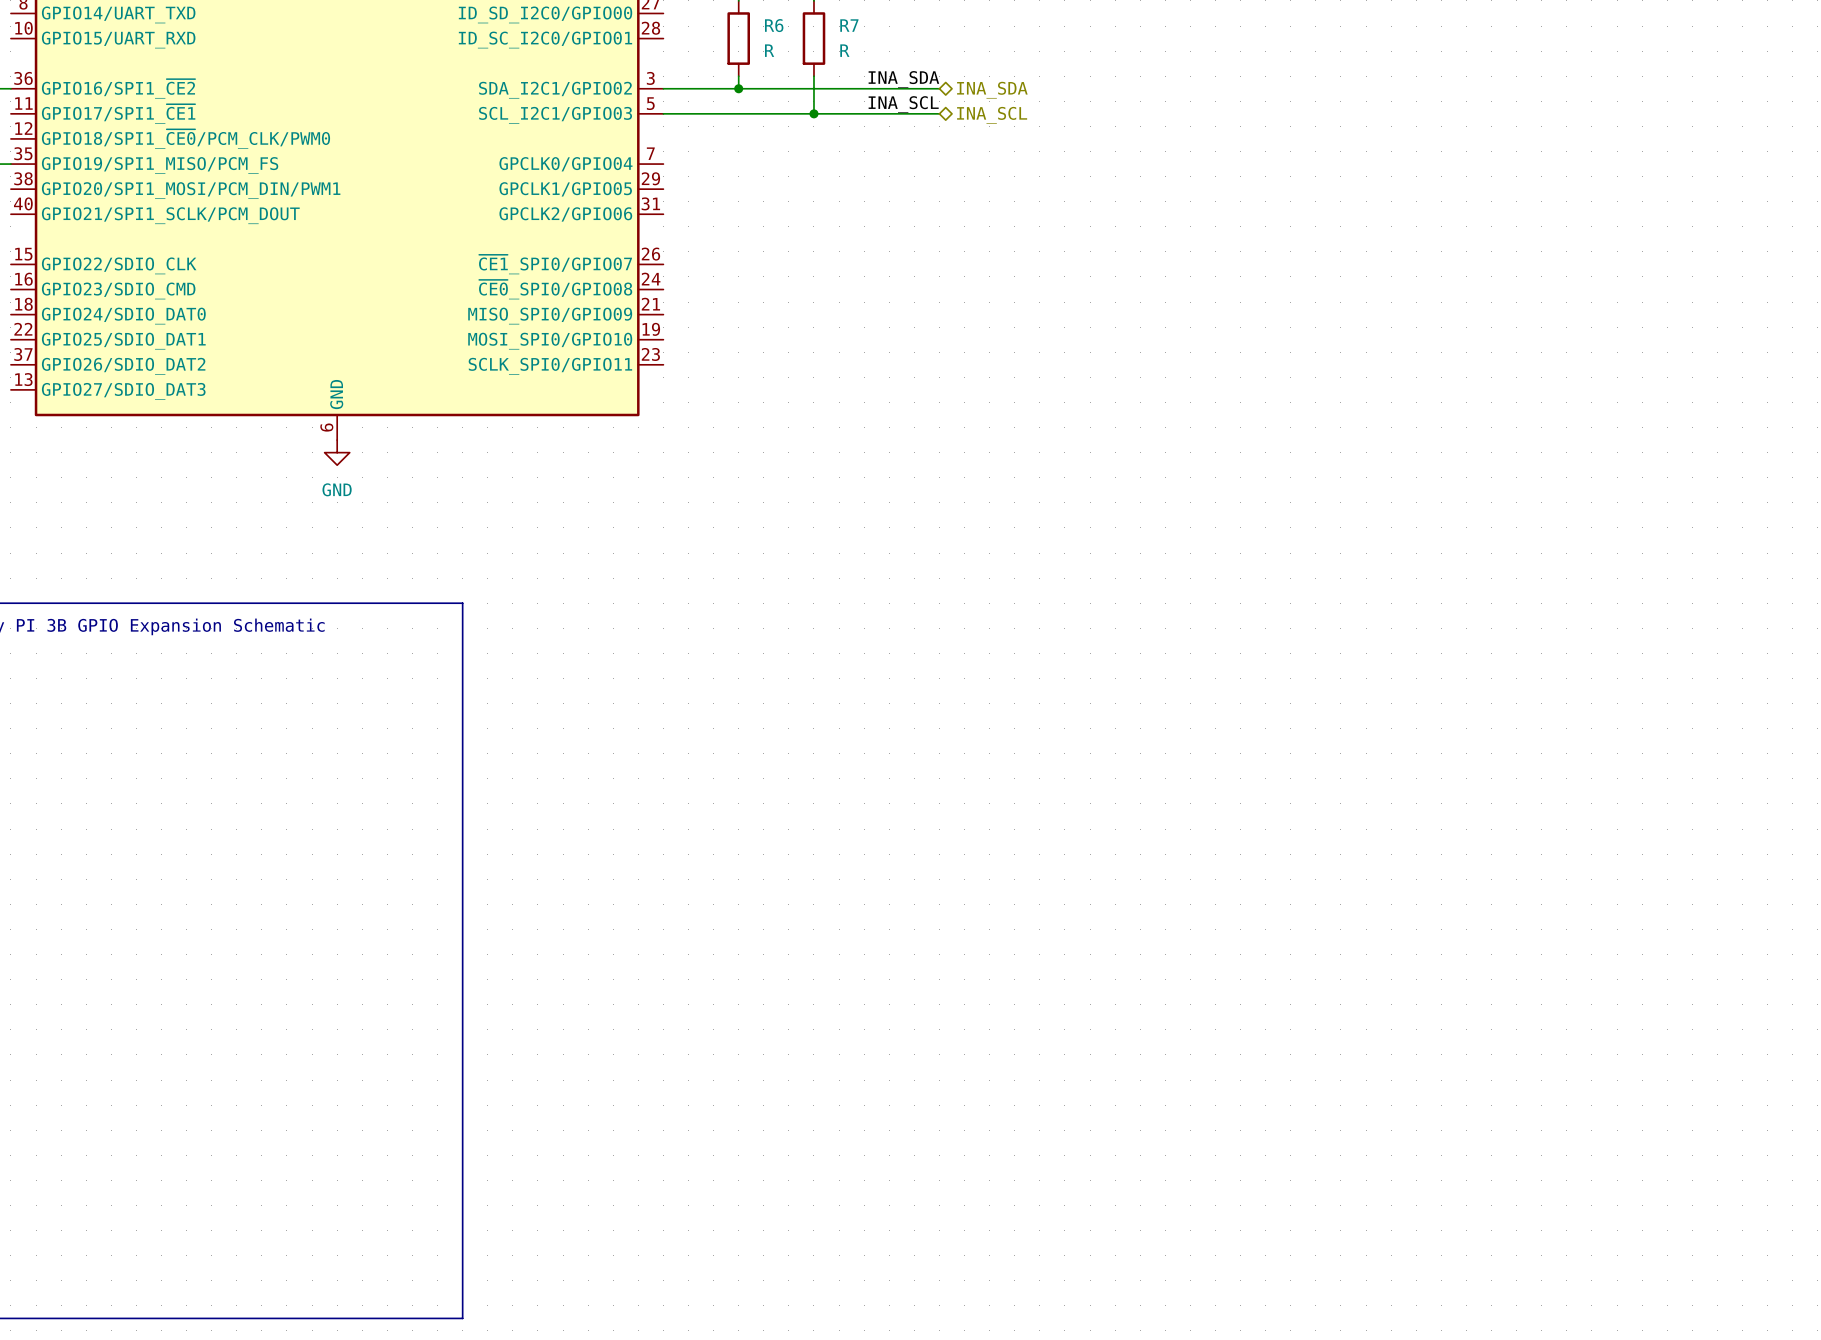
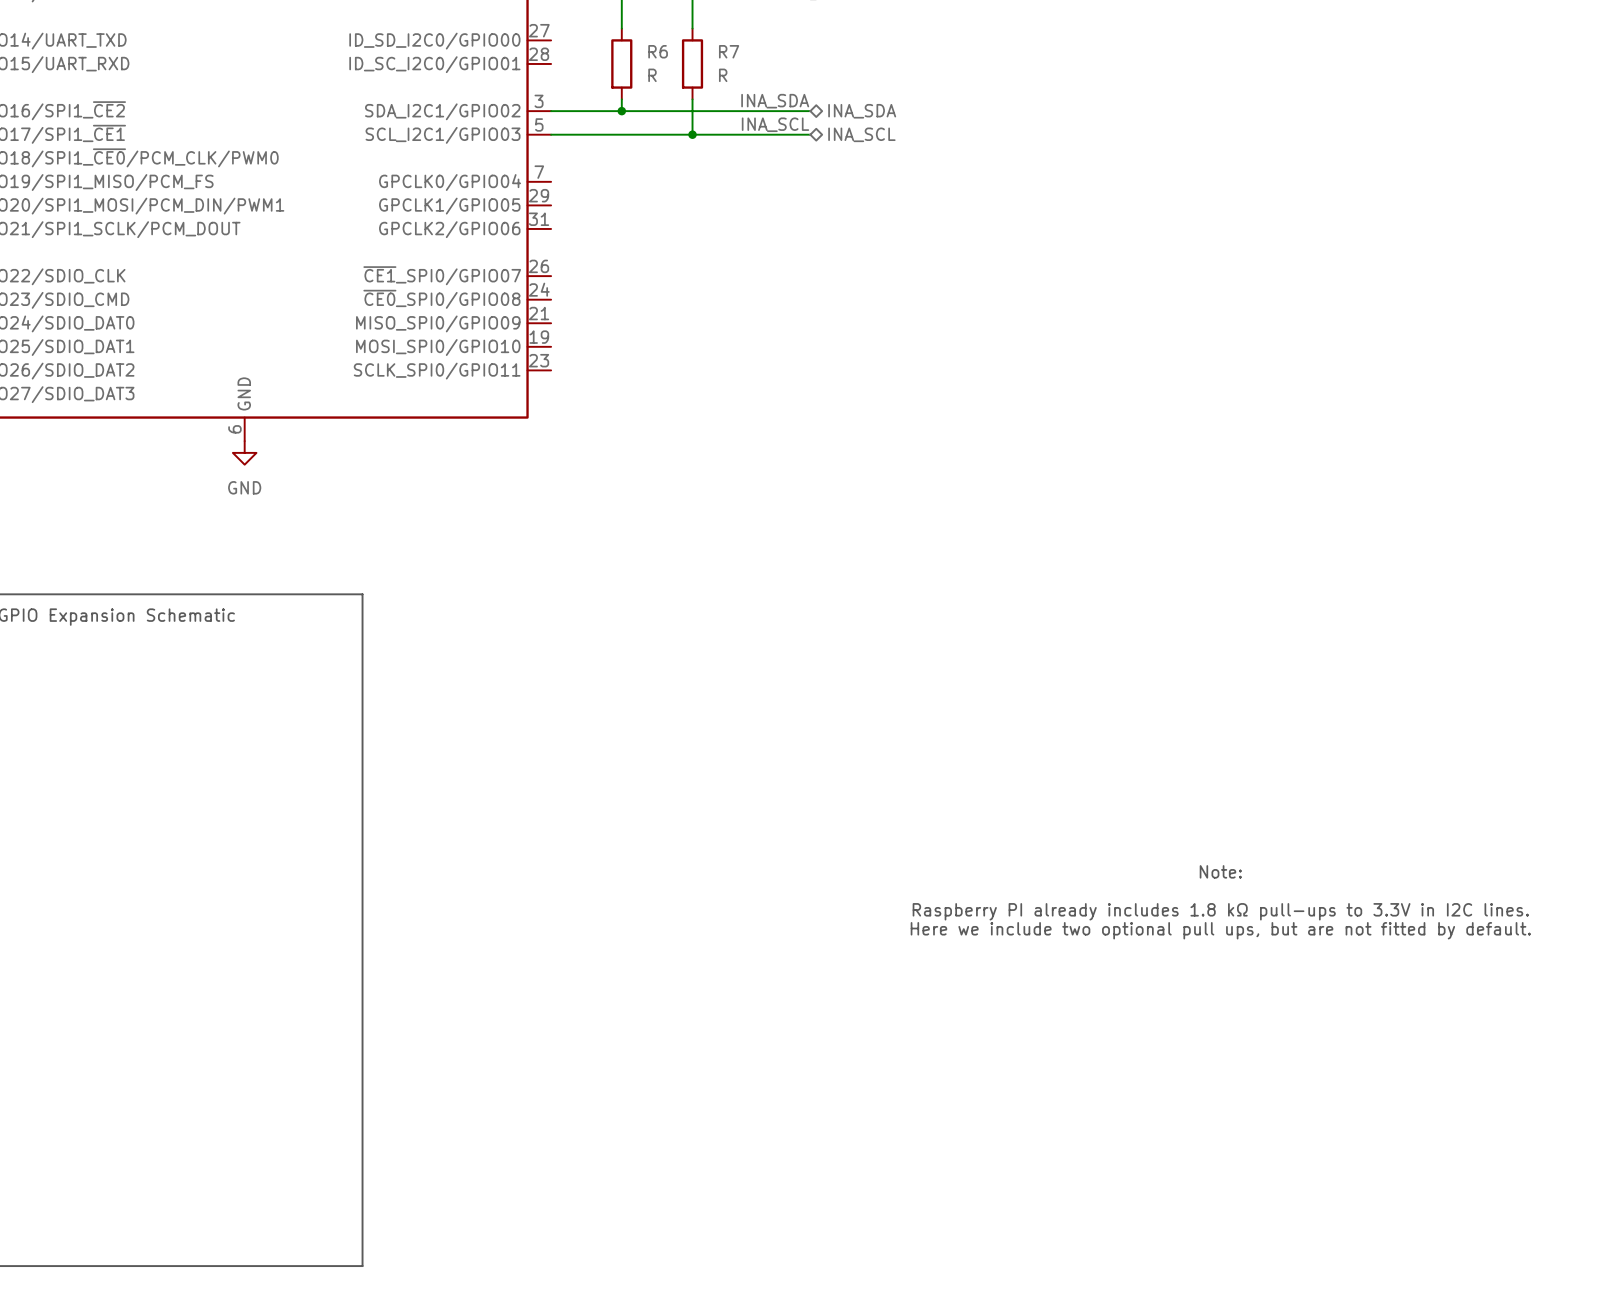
text: none -> Note: (1220, 871)
text: none -> Raspberry PI already includes 1.8 kΩ pull-ups to 3.3V in I2C lines. (1220, 911)
text: none -> Here we include two optional pull ups, but are not fitted by default. (1220, 930)

